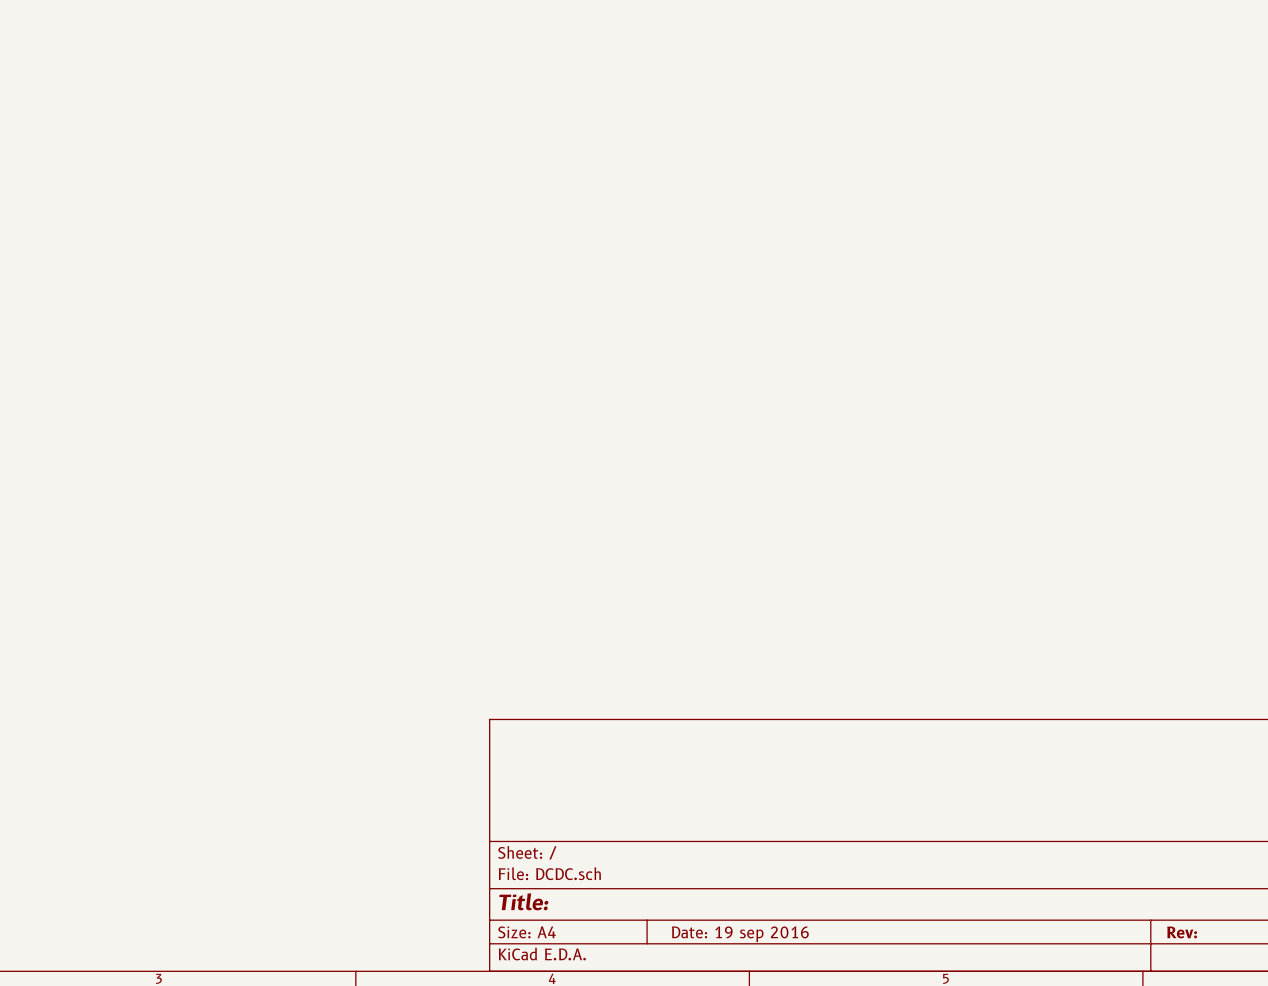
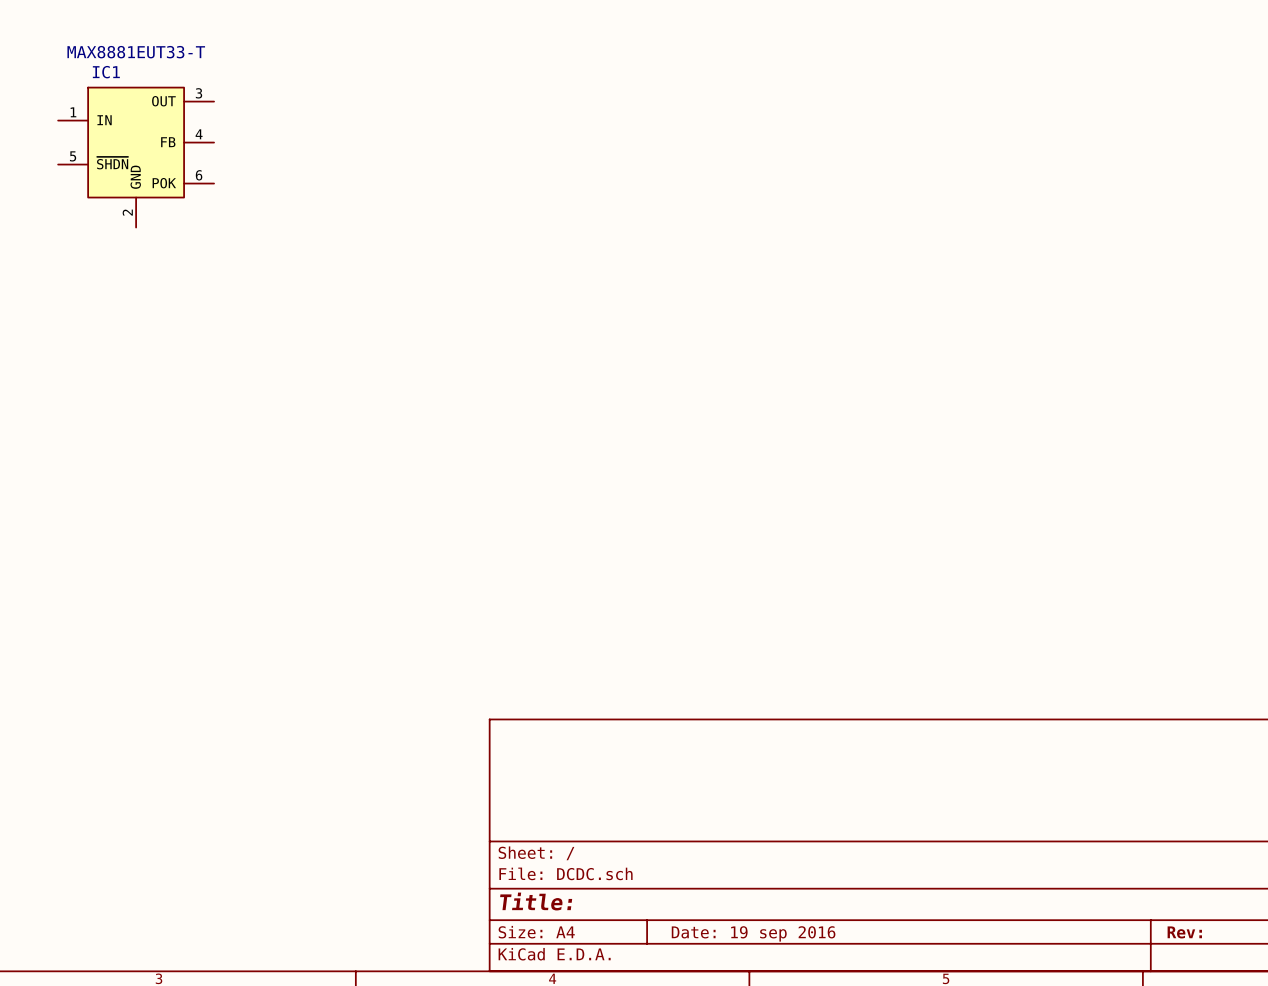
IC1: none -> MAX8881EUT33-T (136, 157)

